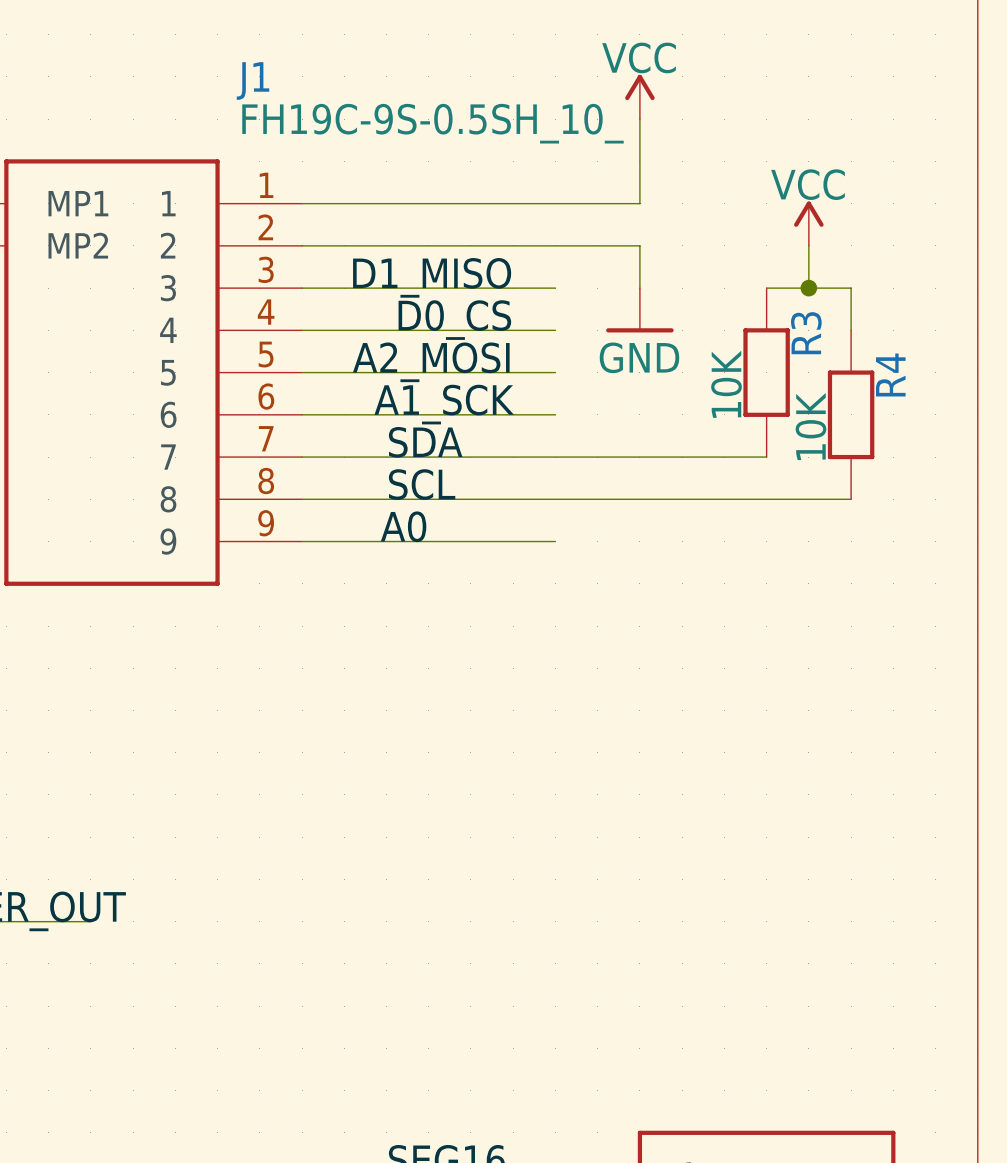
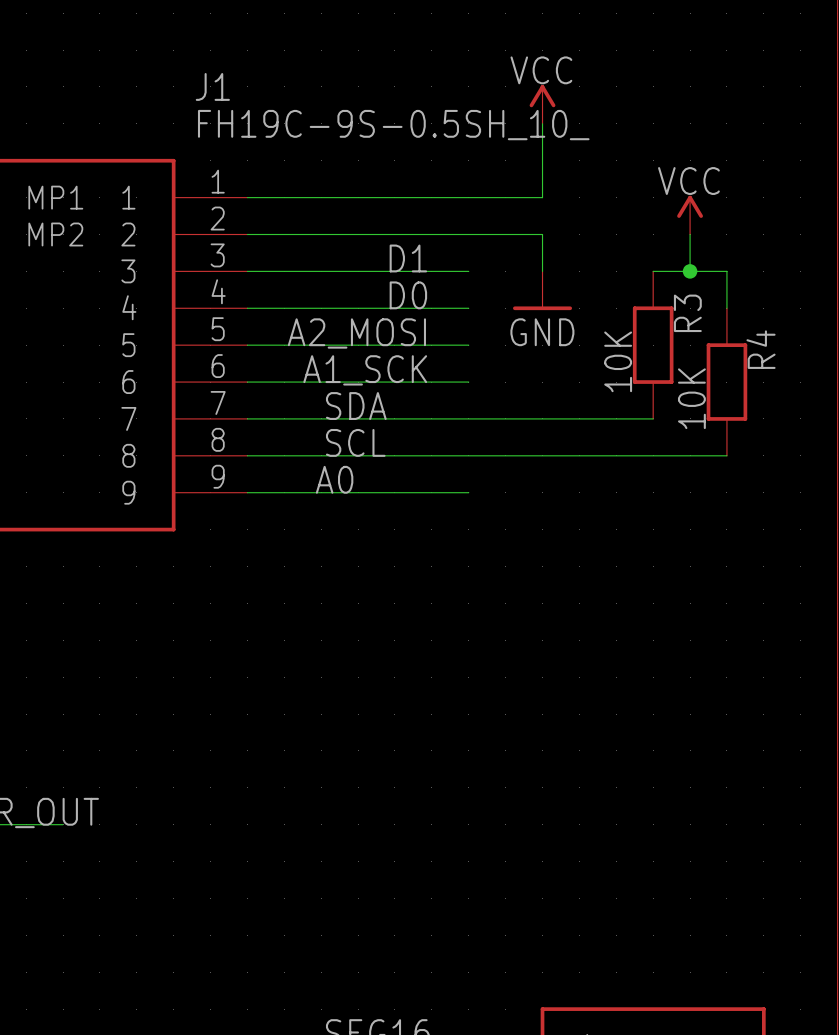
label: D1_MISO (432, 277) -> D1 (408, 258)
label: D0_CS (454, 320) -> D0 (408, 295)

